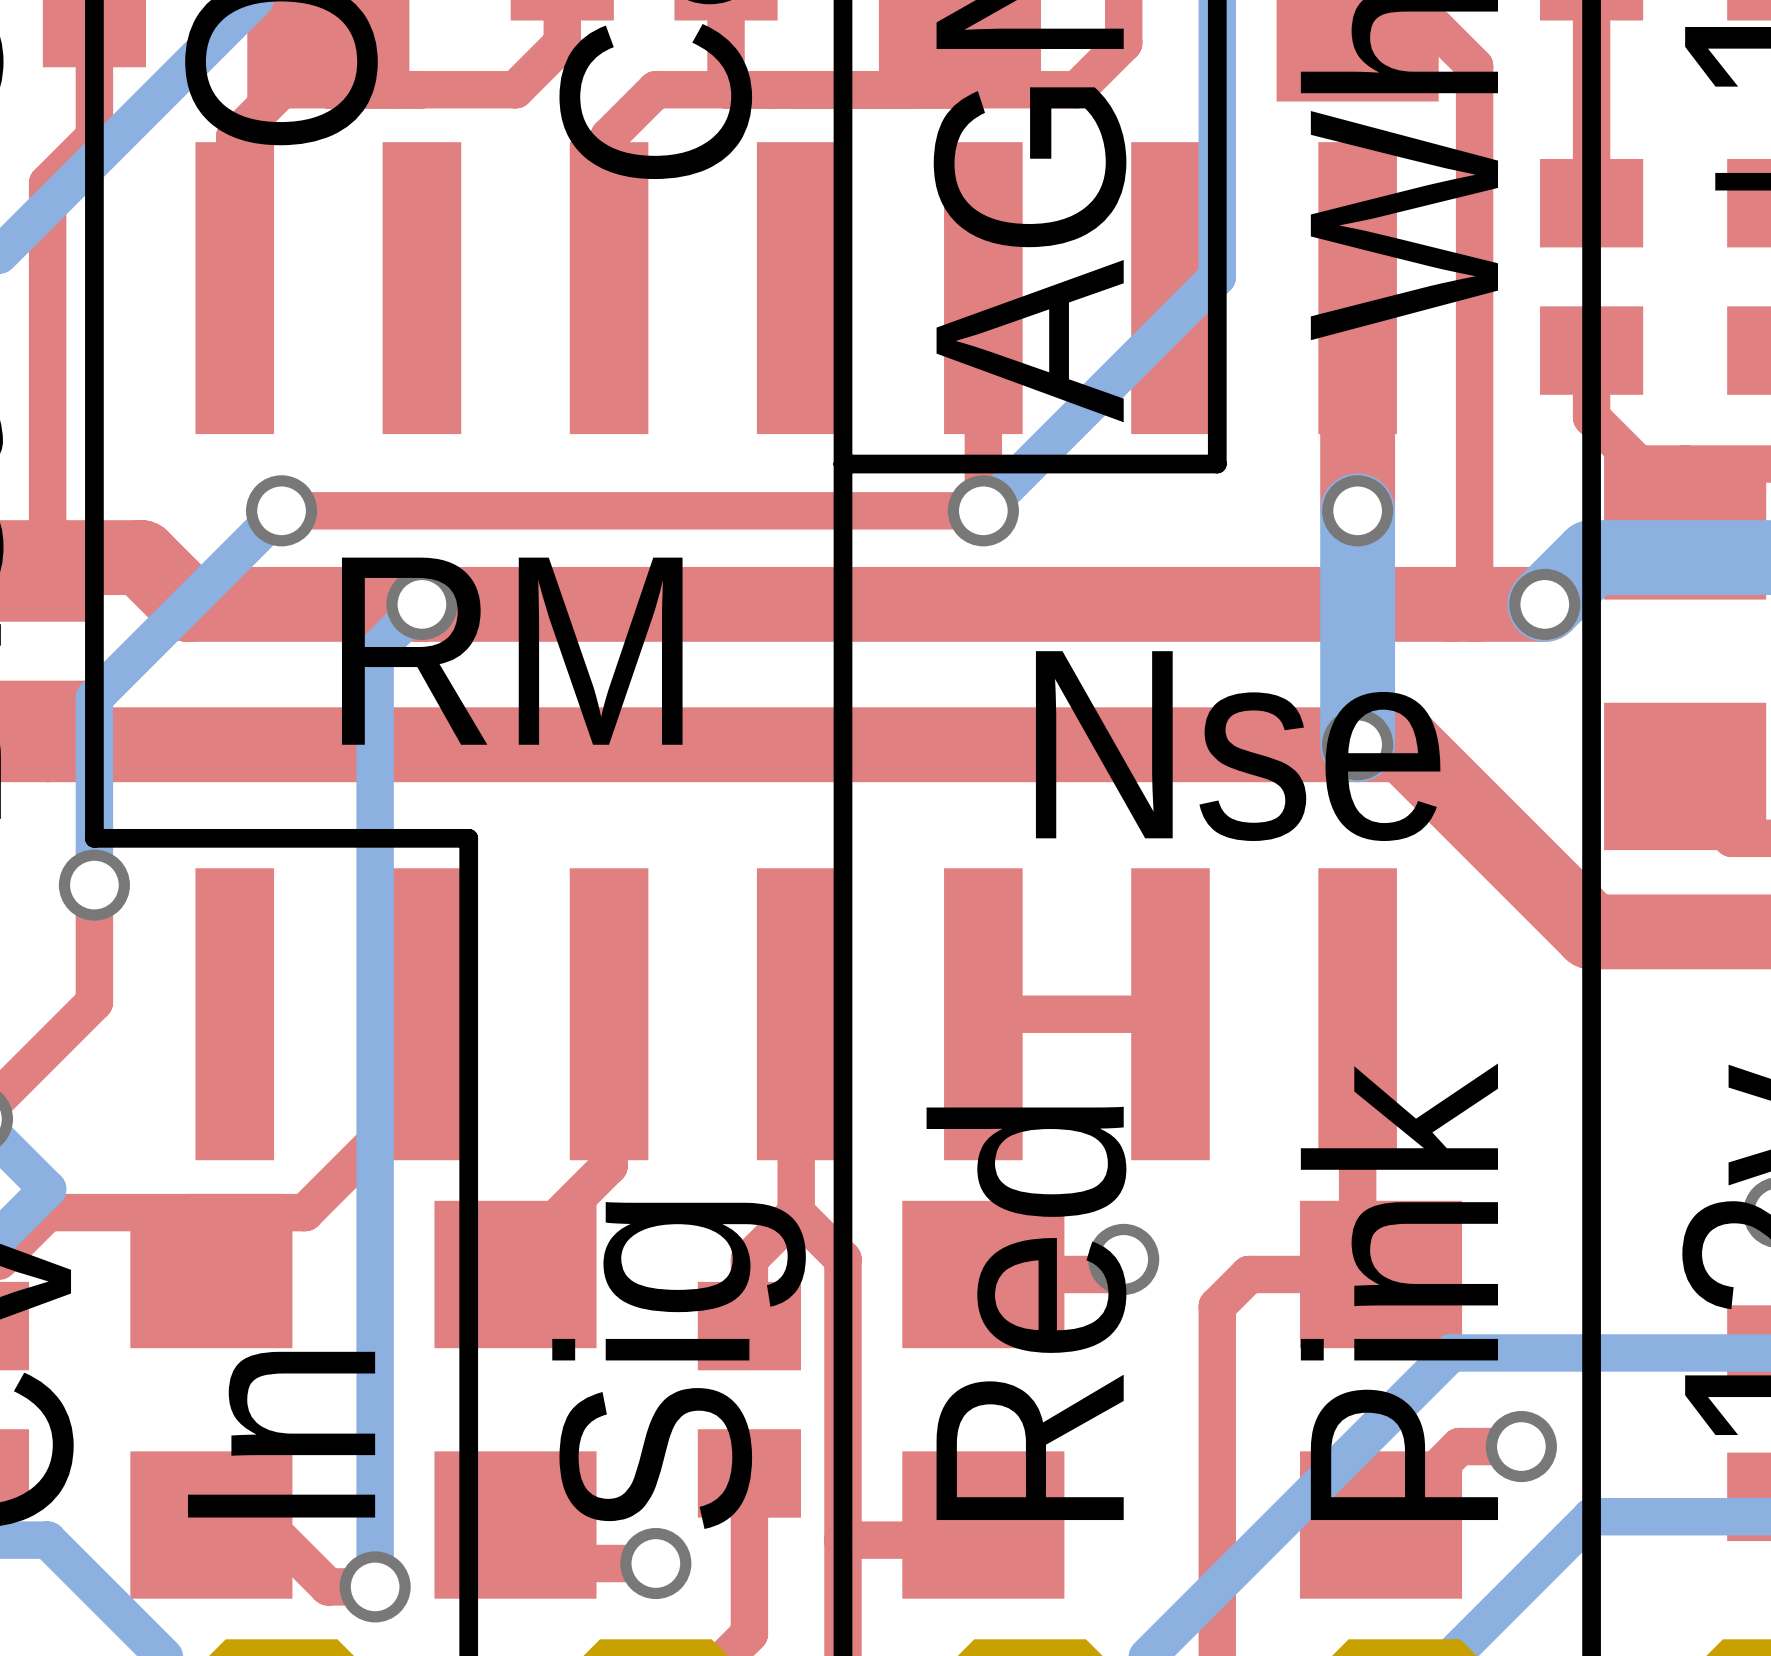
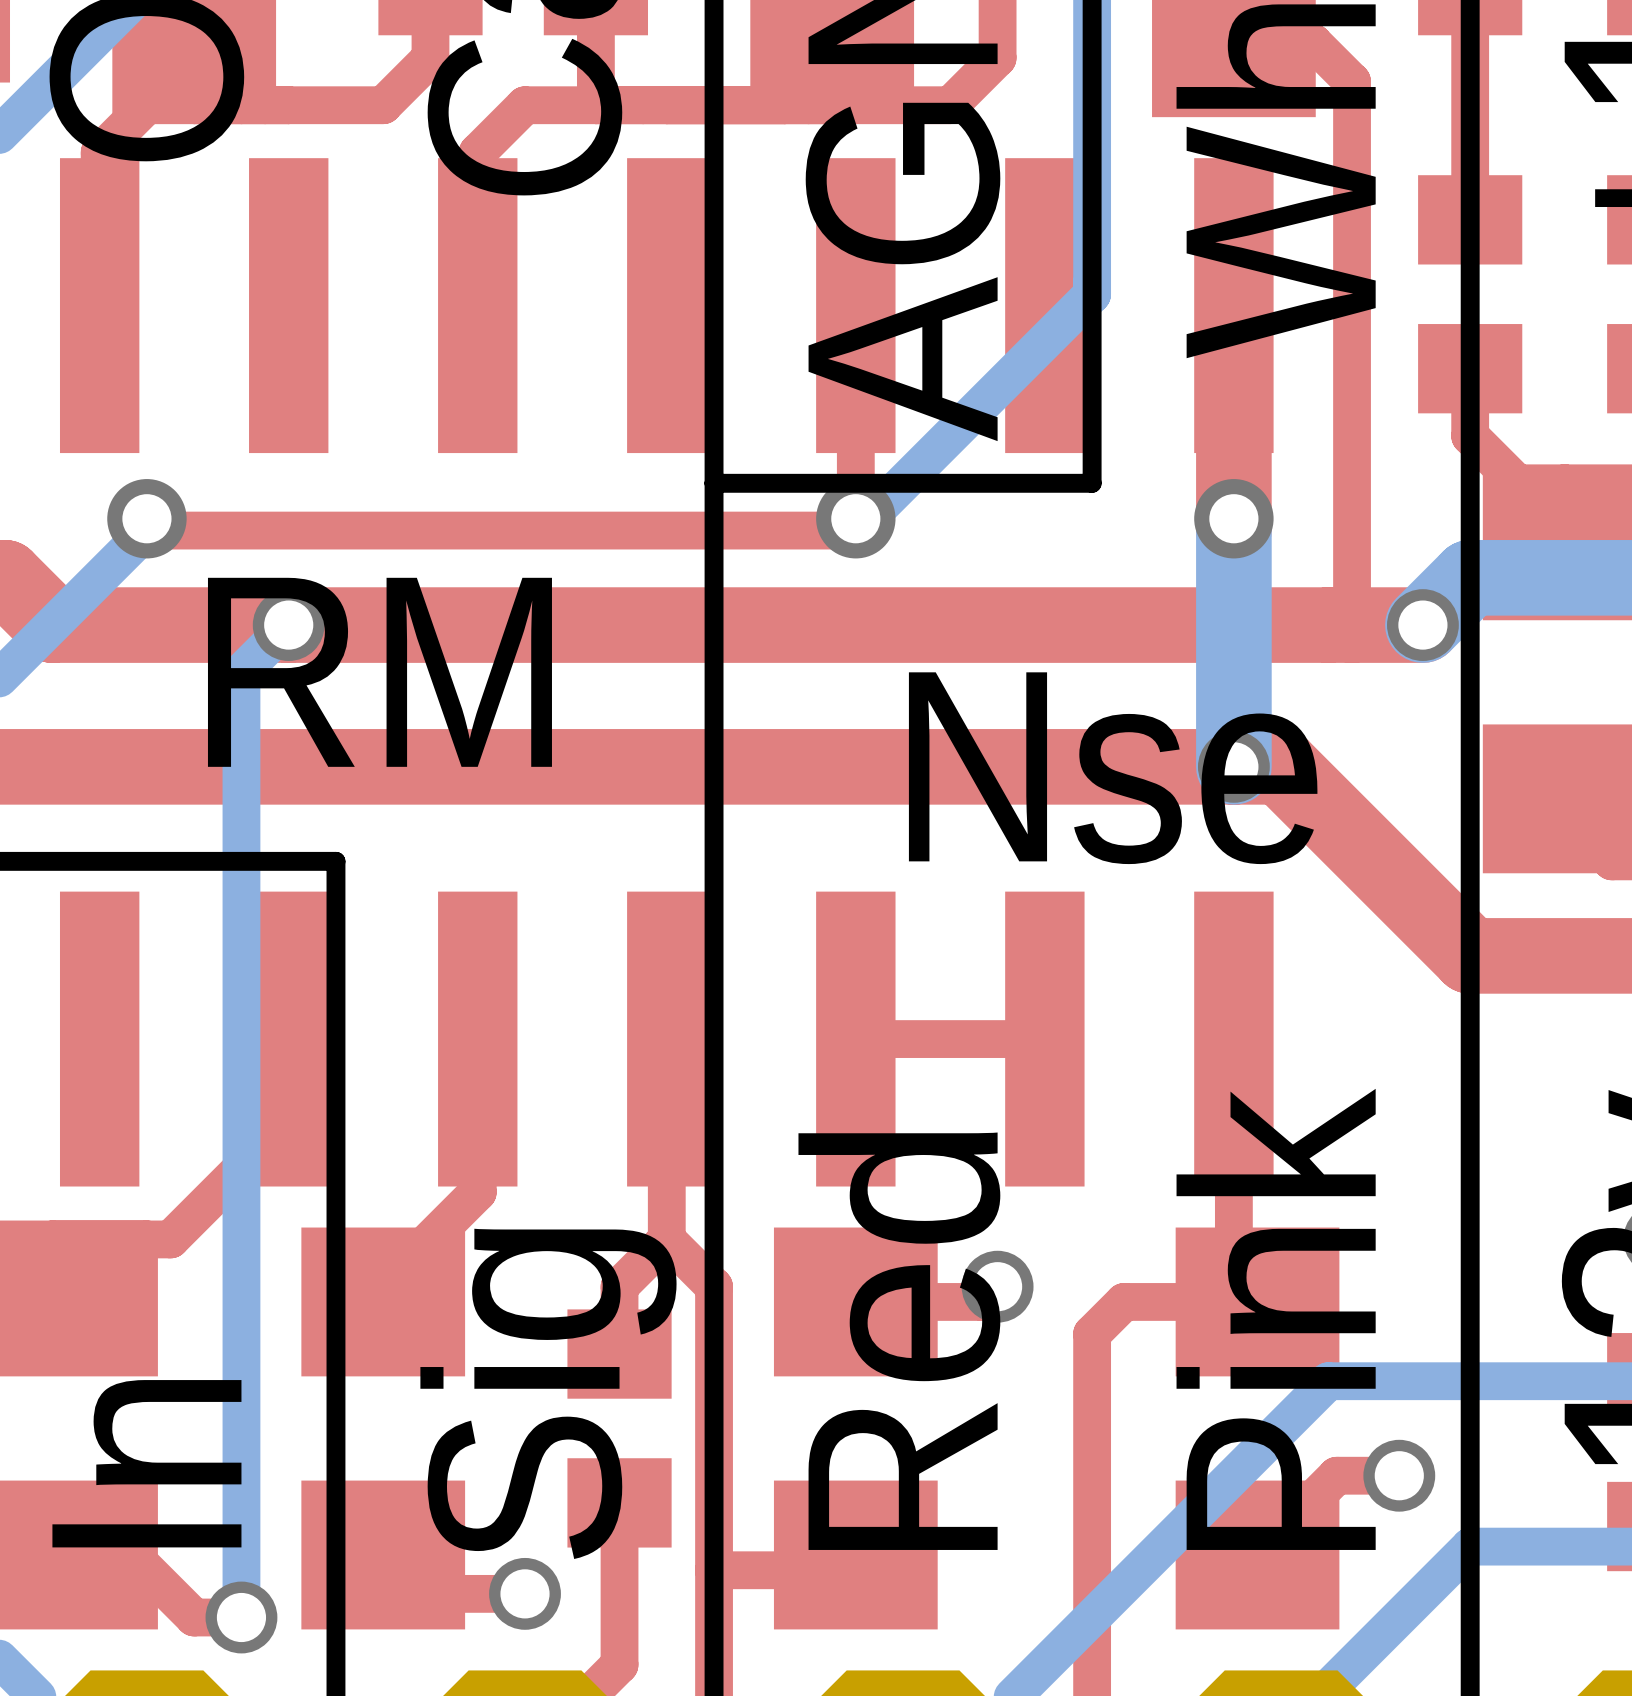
via size: [246, 475, 318, 547] -> [107, 479, 187, 559]
via size: [947, 475, 1019, 547] -> [816, 479, 896, 559]
via size: [1322, 475, 1394, 547] -> [1194, 479, 1274, 559]

